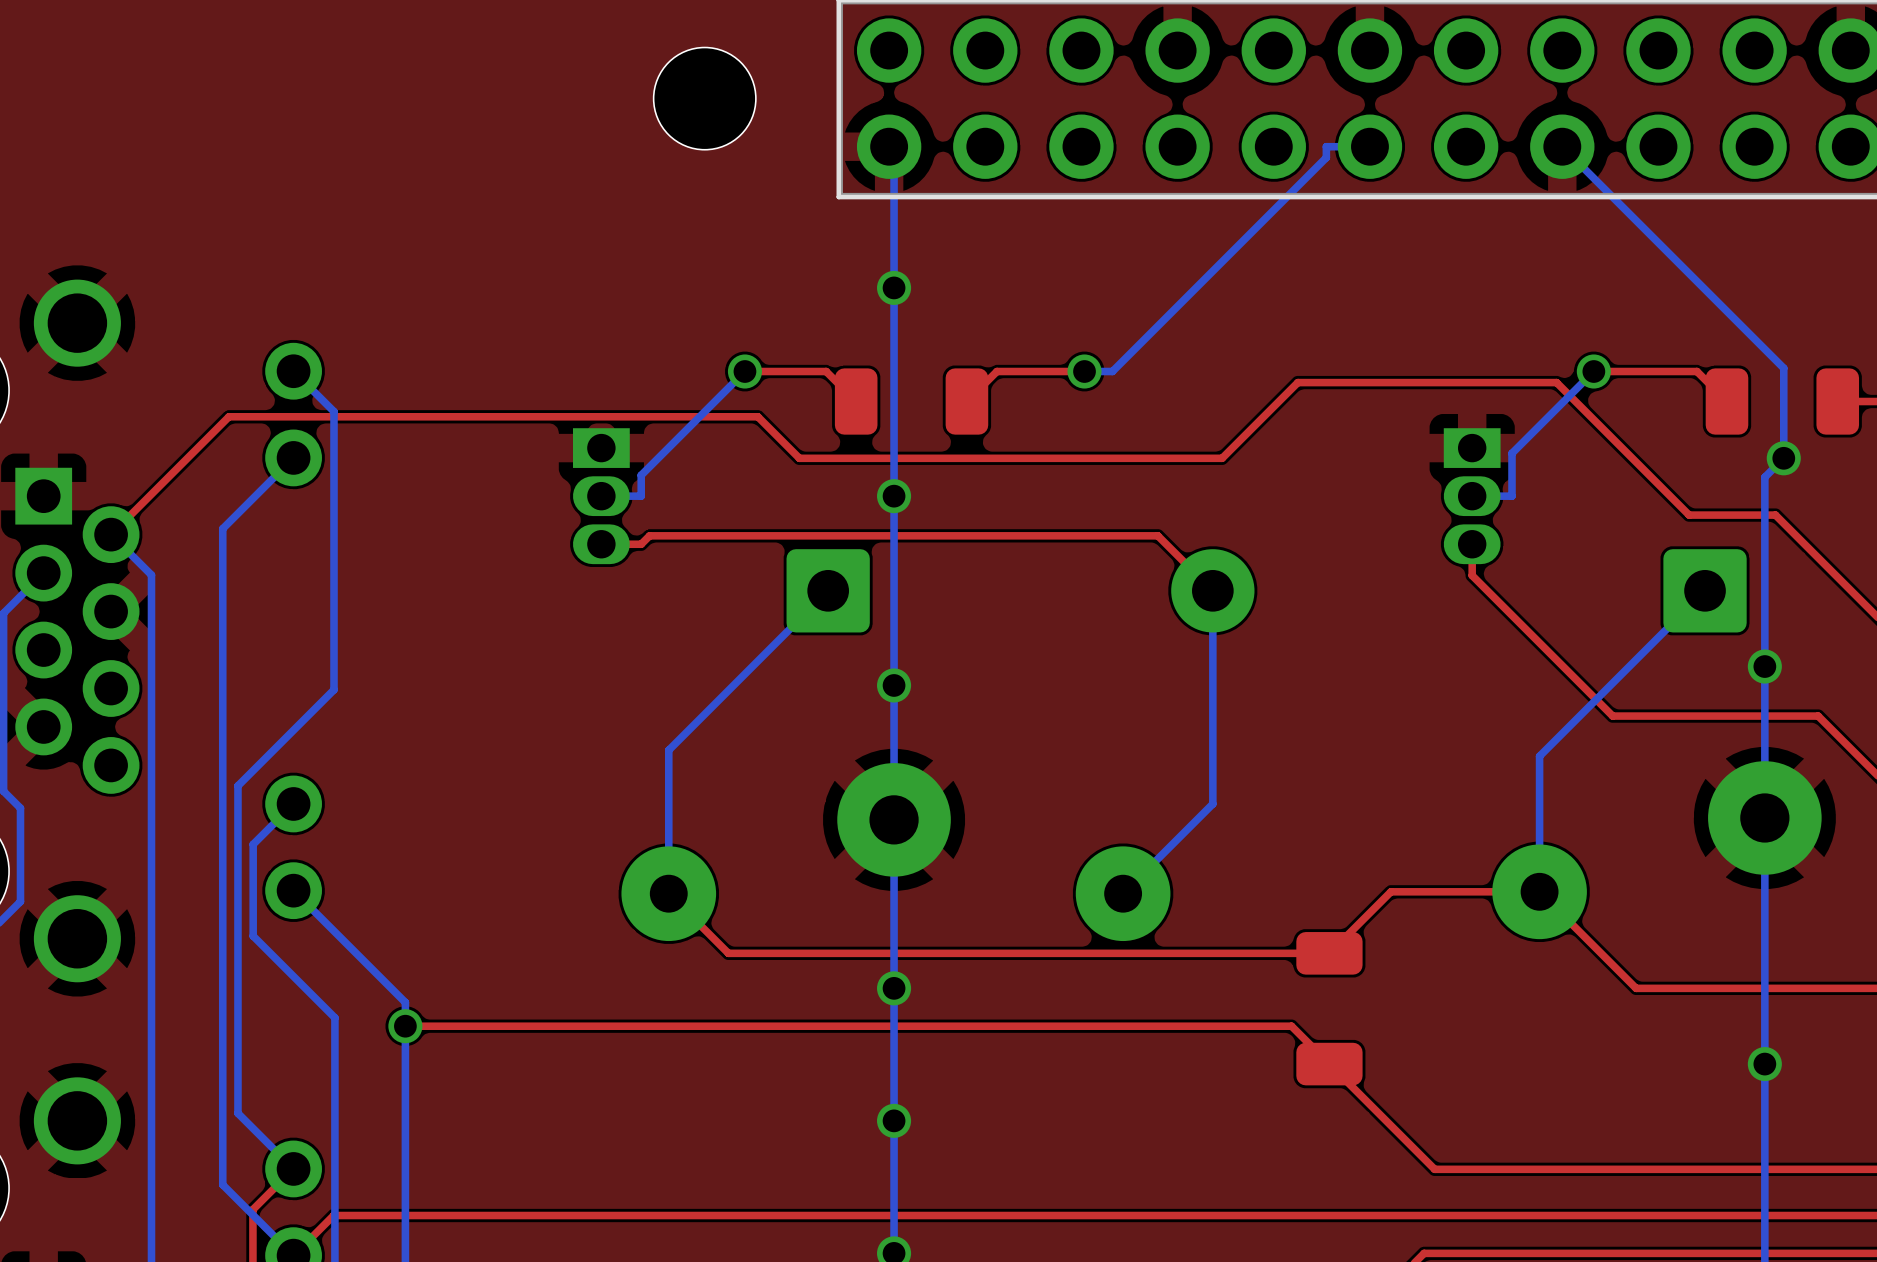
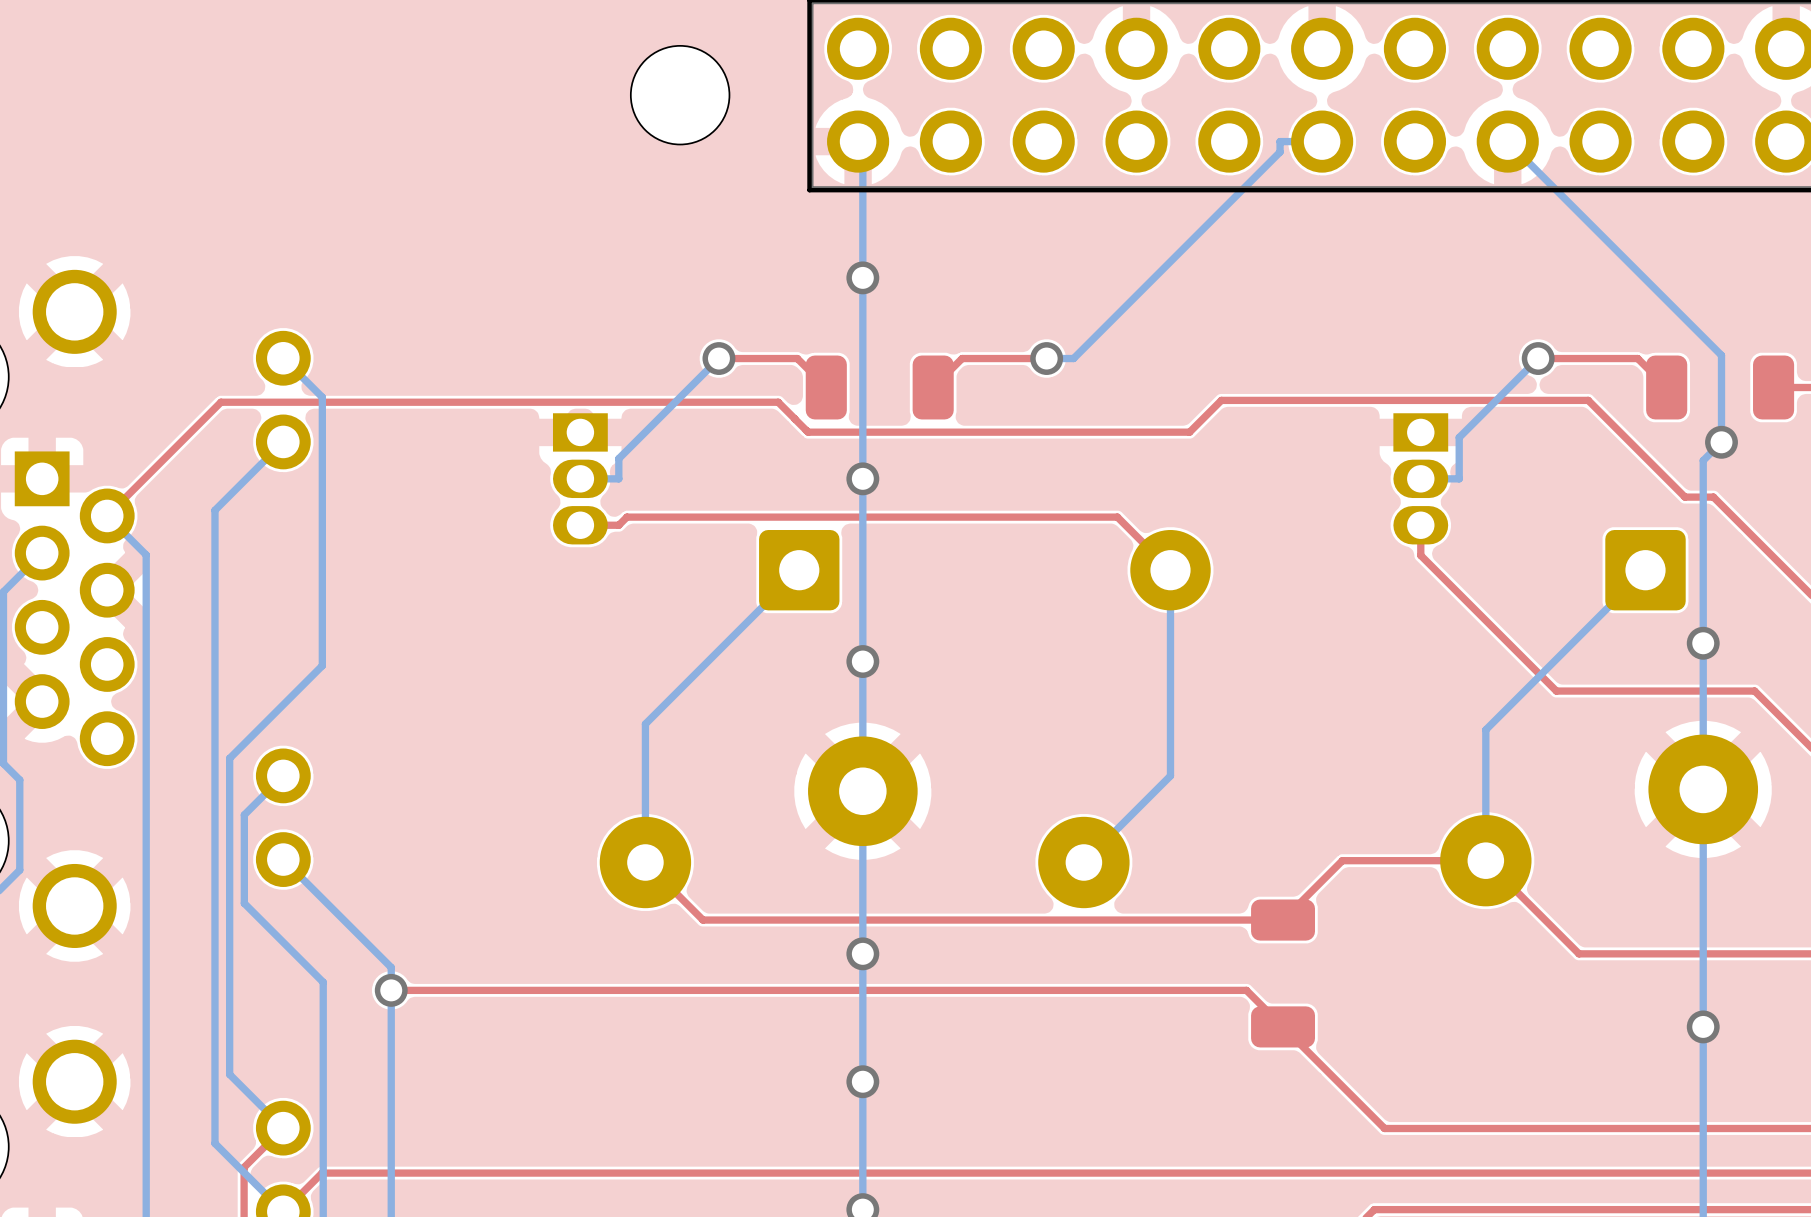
top track: (1265, 414) (1297, 382) (1556, 382) (1689, 515) (1745, 515) -> (1221, 400) (1588, 400) (1684, 497)
top track: (757, 416) (799, 458) (1222, 458) (1232, 447) -> (731, 402) (778, 402) (808, 432) (1189, 432)

